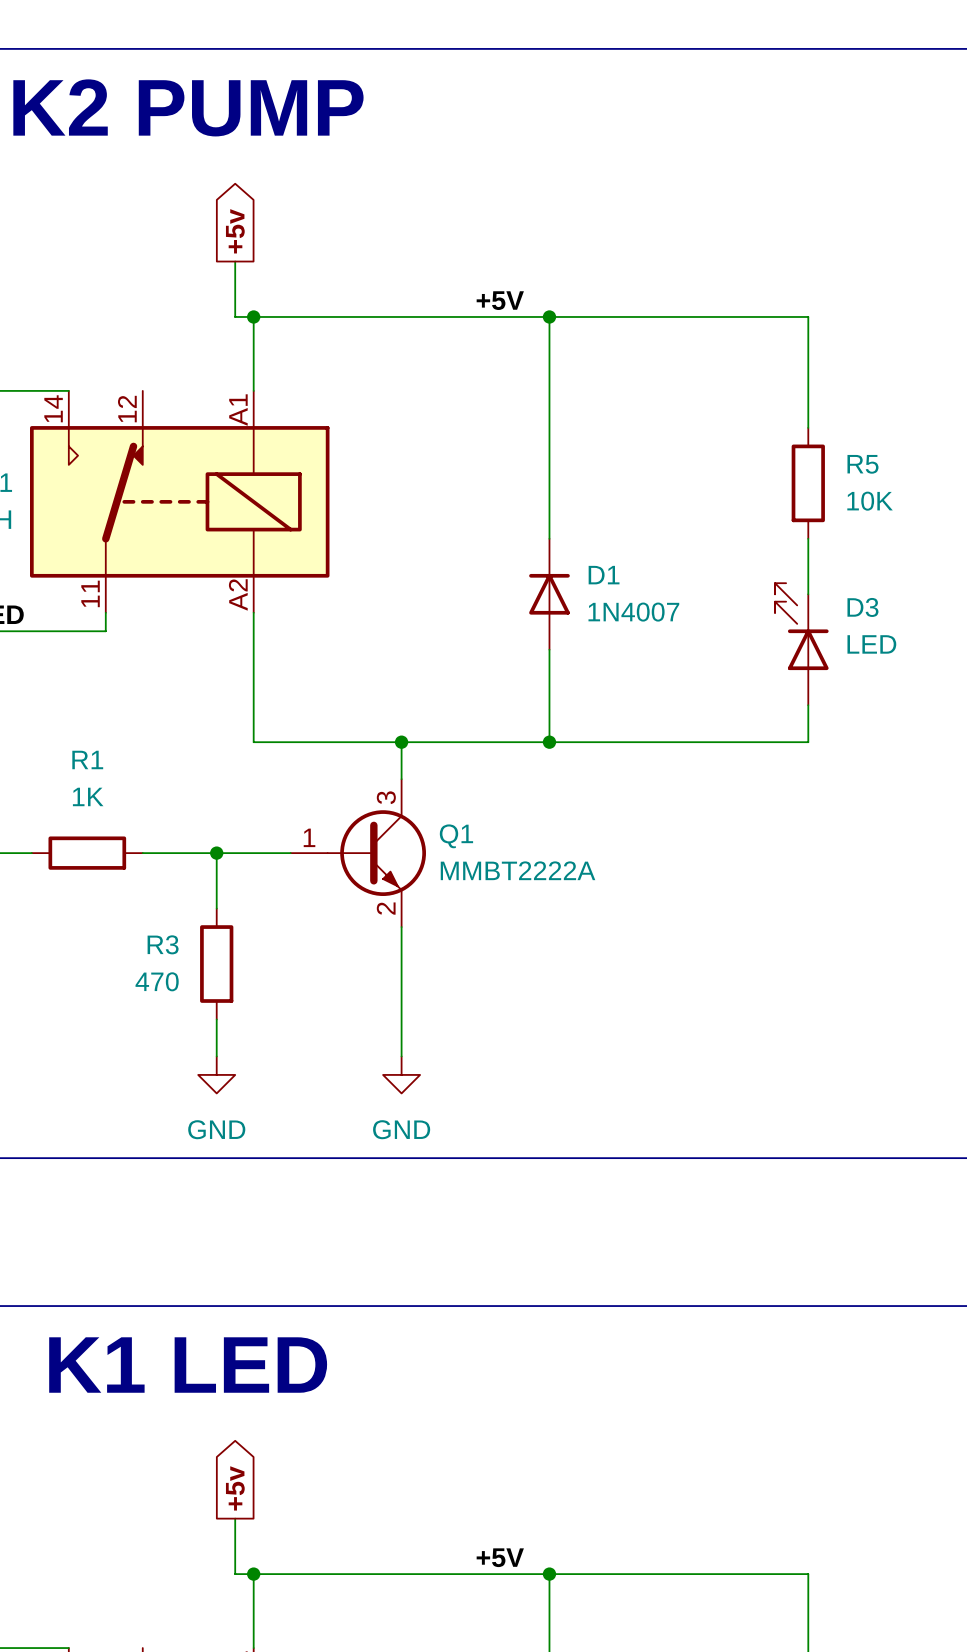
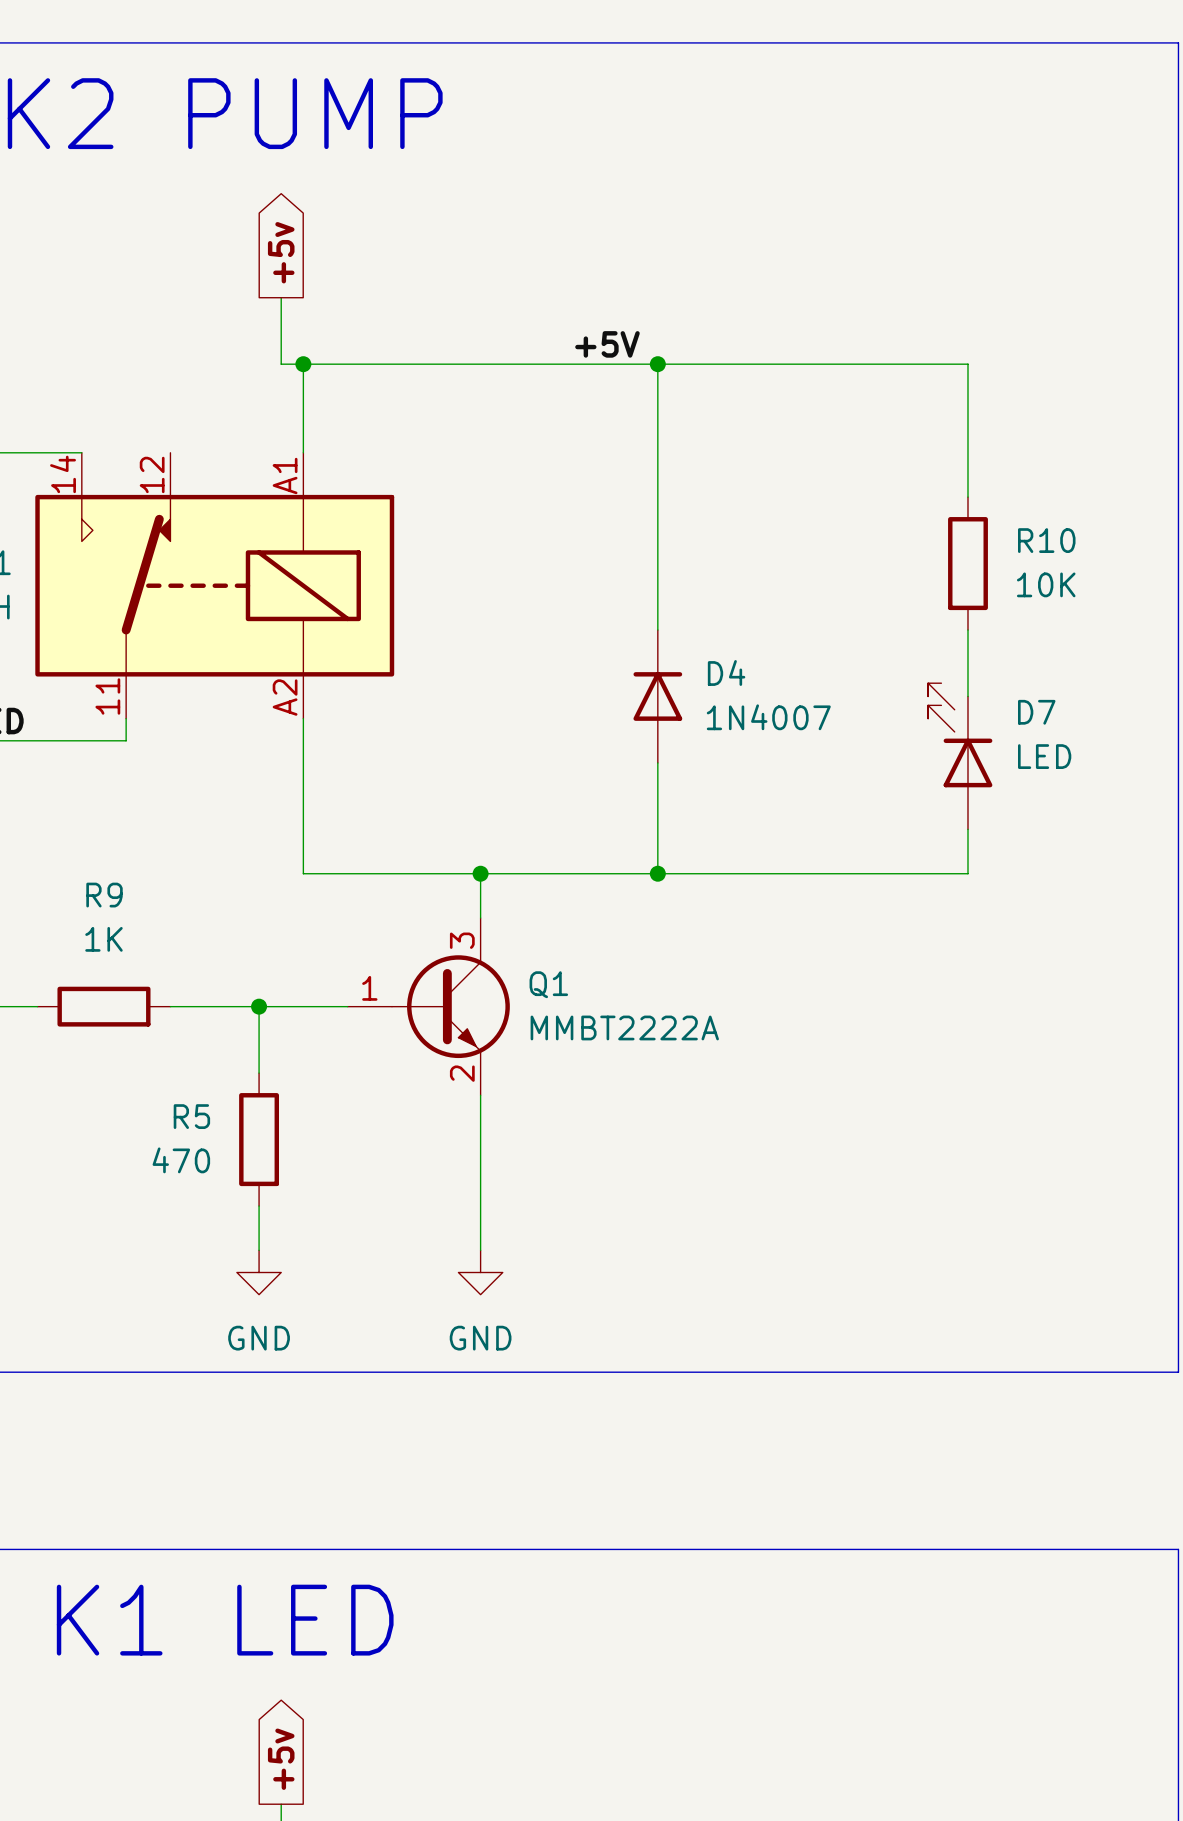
R5 name: R5 (862, 464) -> R10 (1046, 540)
D1 name: D1 (604, 575) -> D4 (726, 672)
D3 name: D3 (862, 607) -> D7 (1036, 712)
R1 name: R1 (87, 759) -> R9 (104, 895)
R3 name: R3 (163, 944) -> R5 (191, 1116)

